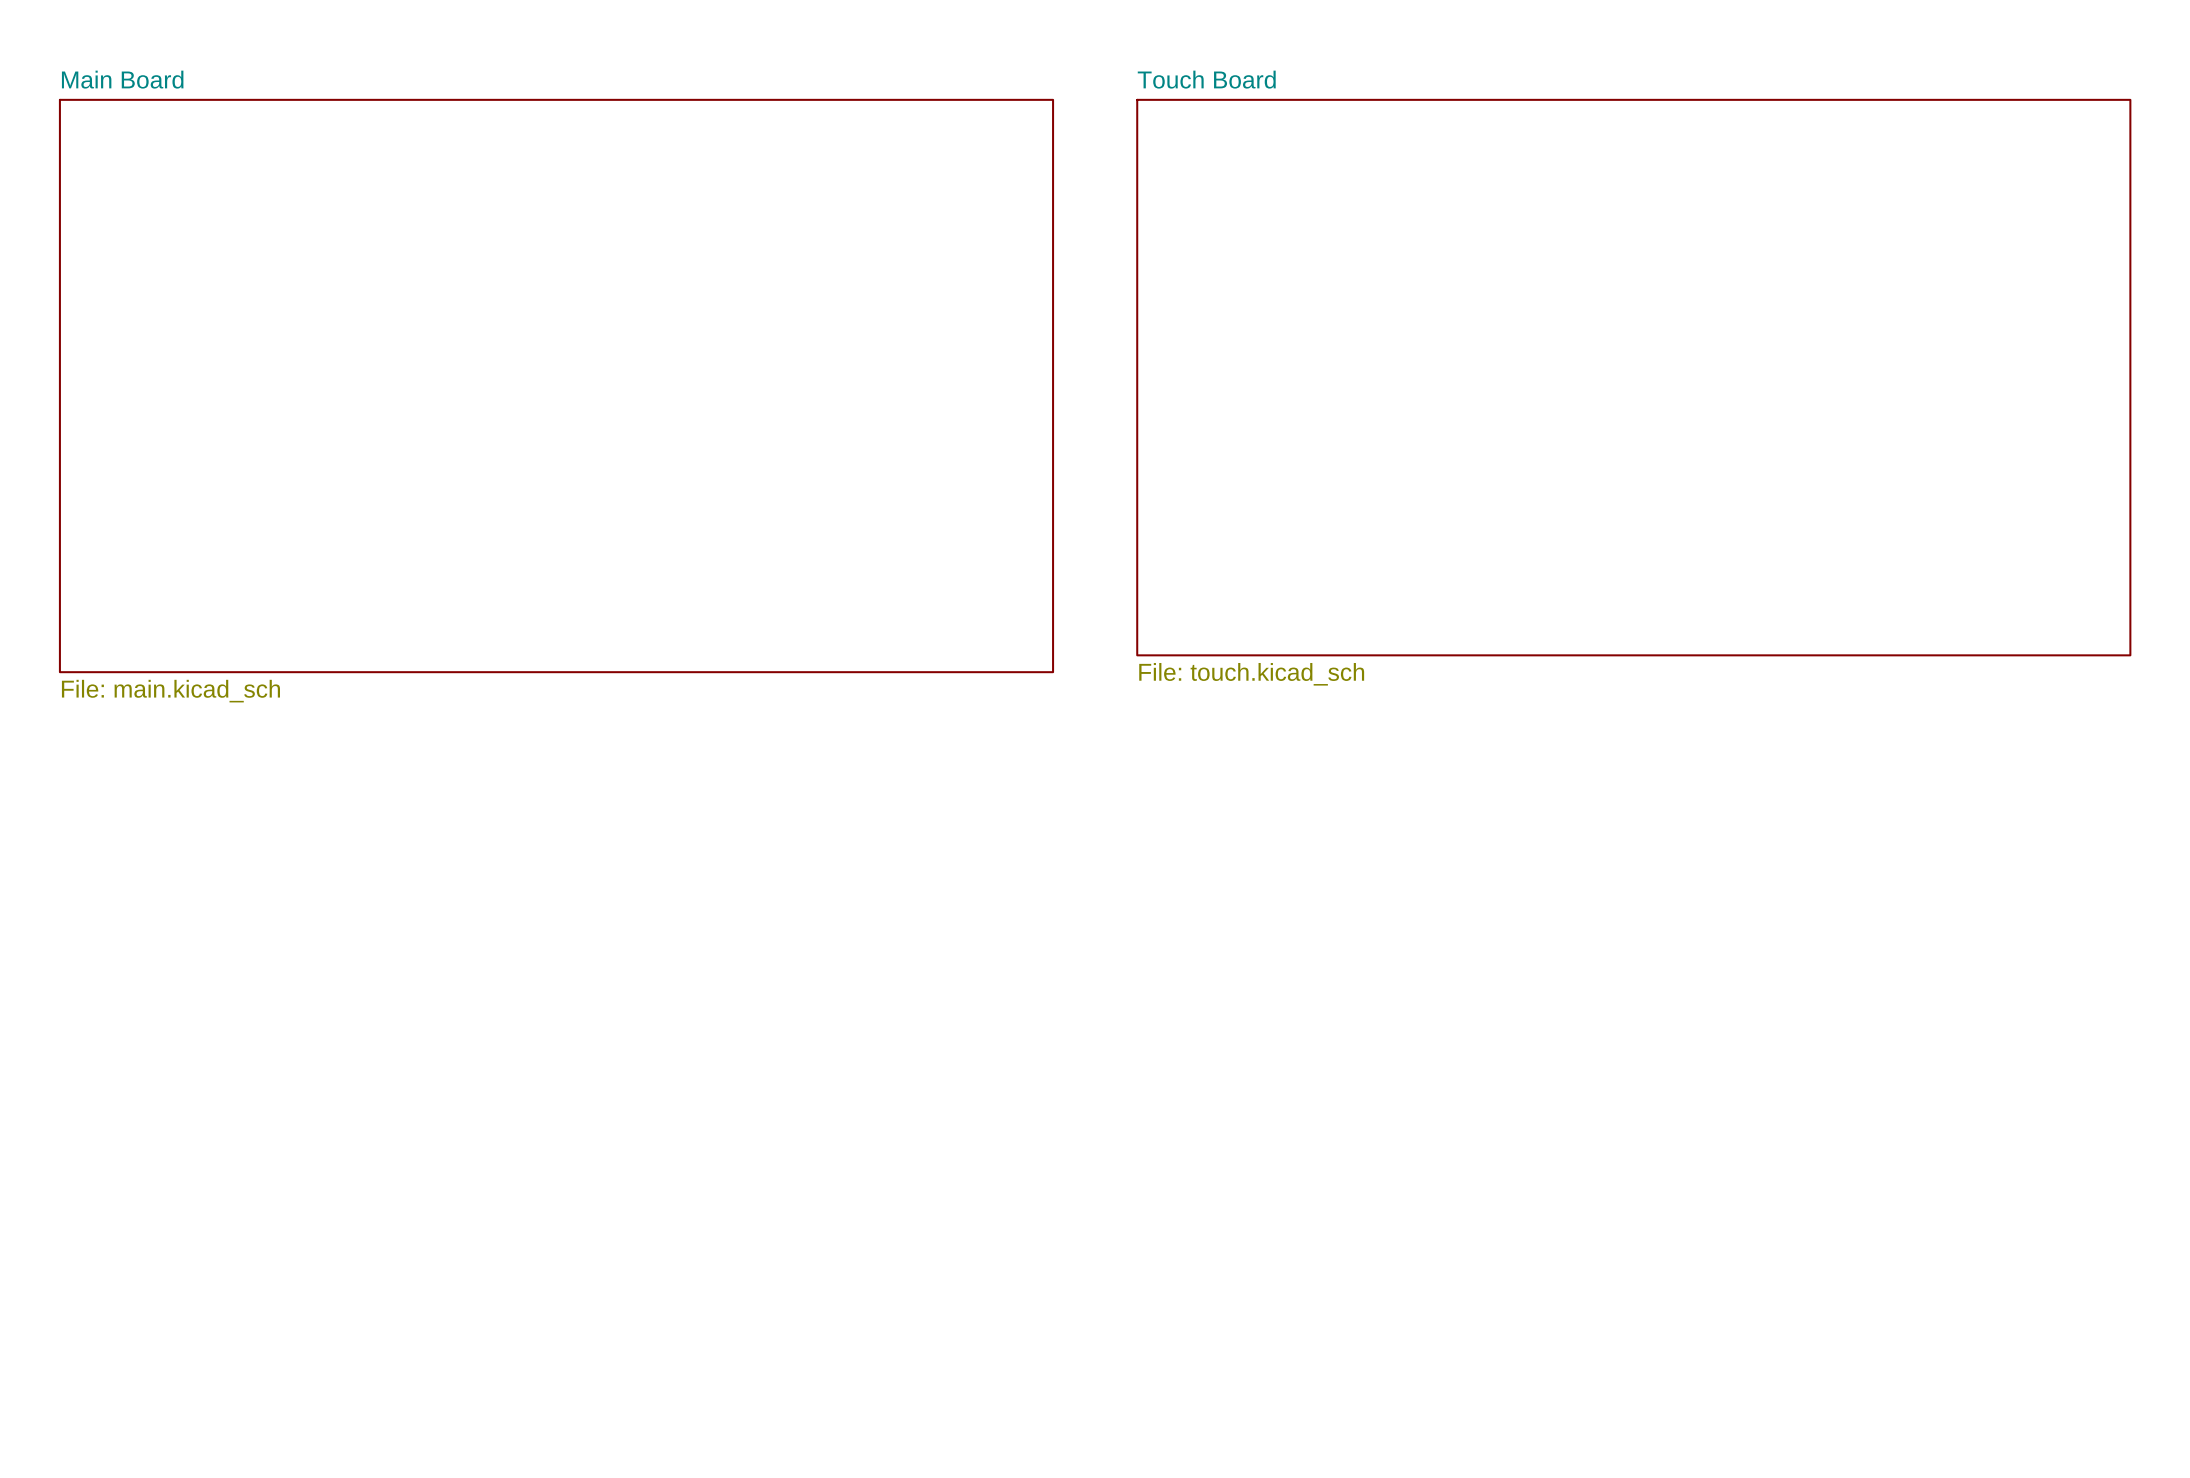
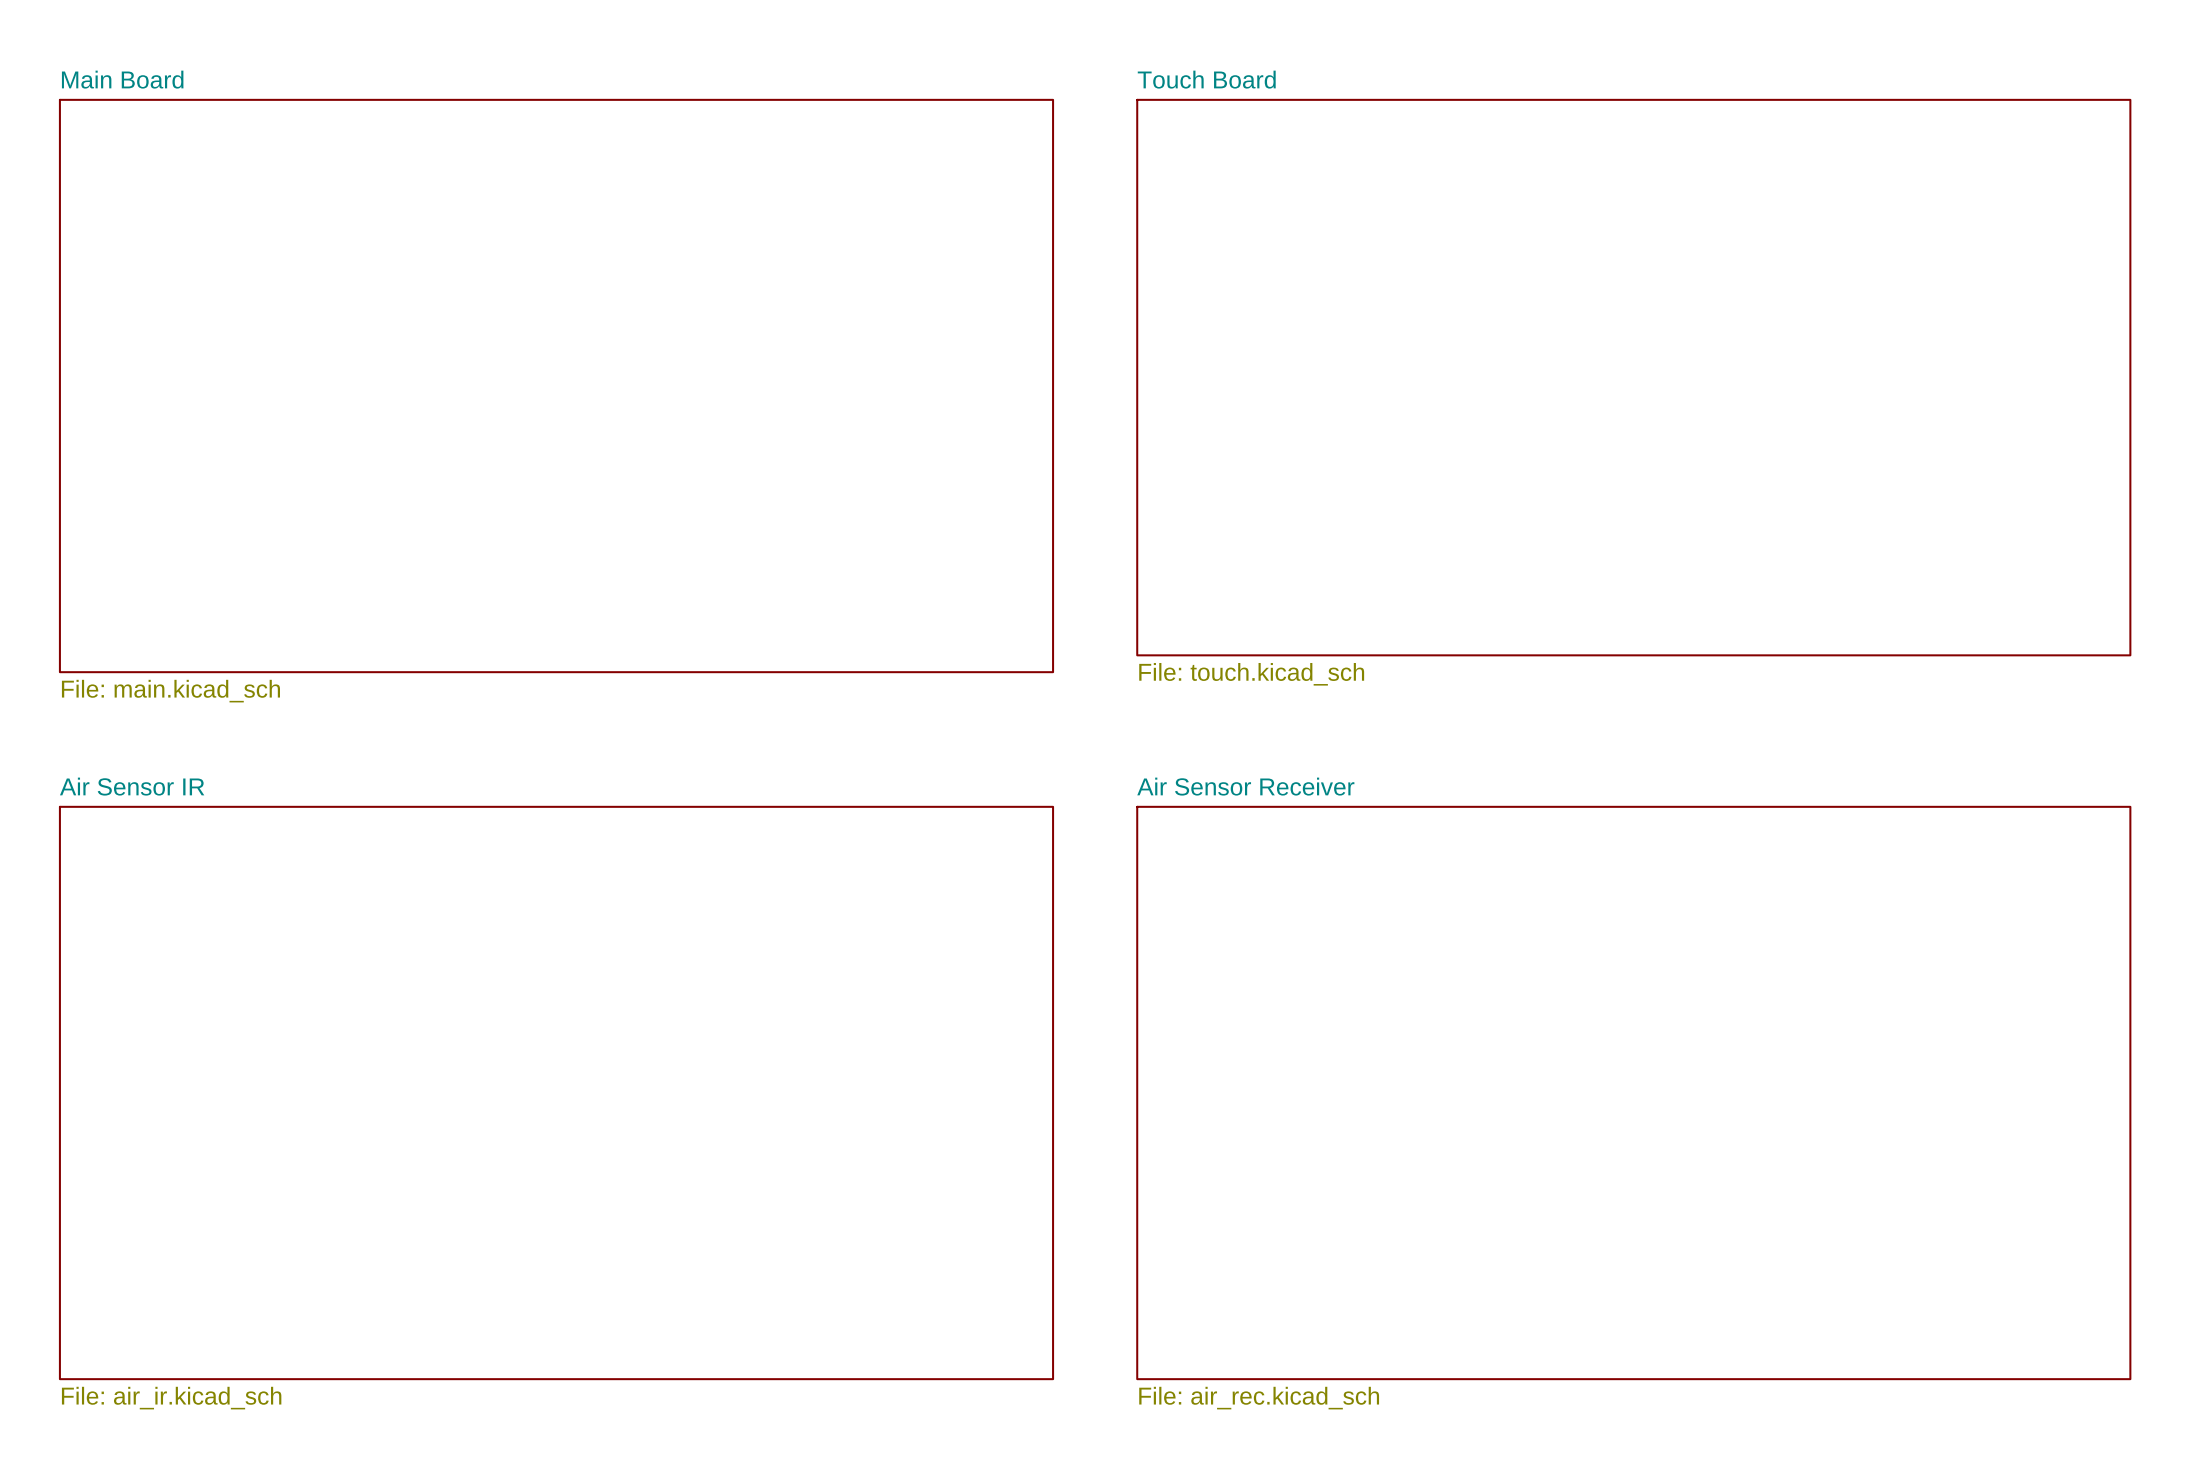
sheet Air Sensor IR: none -> File: air_ir.kicad_sch (556, 1092)
sheet Air Sensor Receiver: none -> File: air_rec.kicad_sch (1633, 1092)

